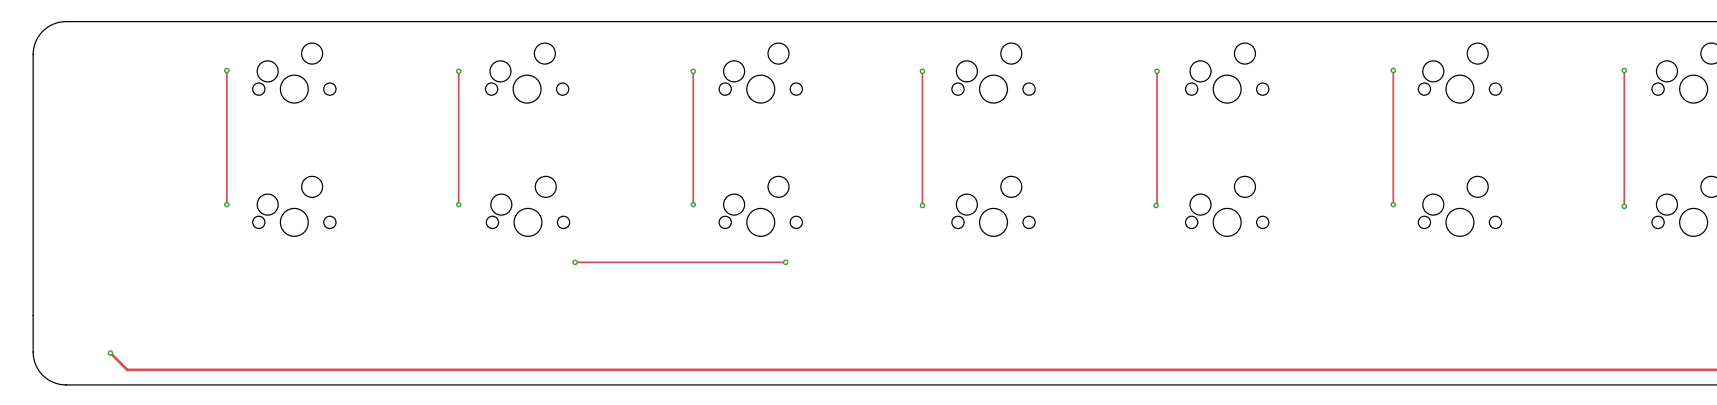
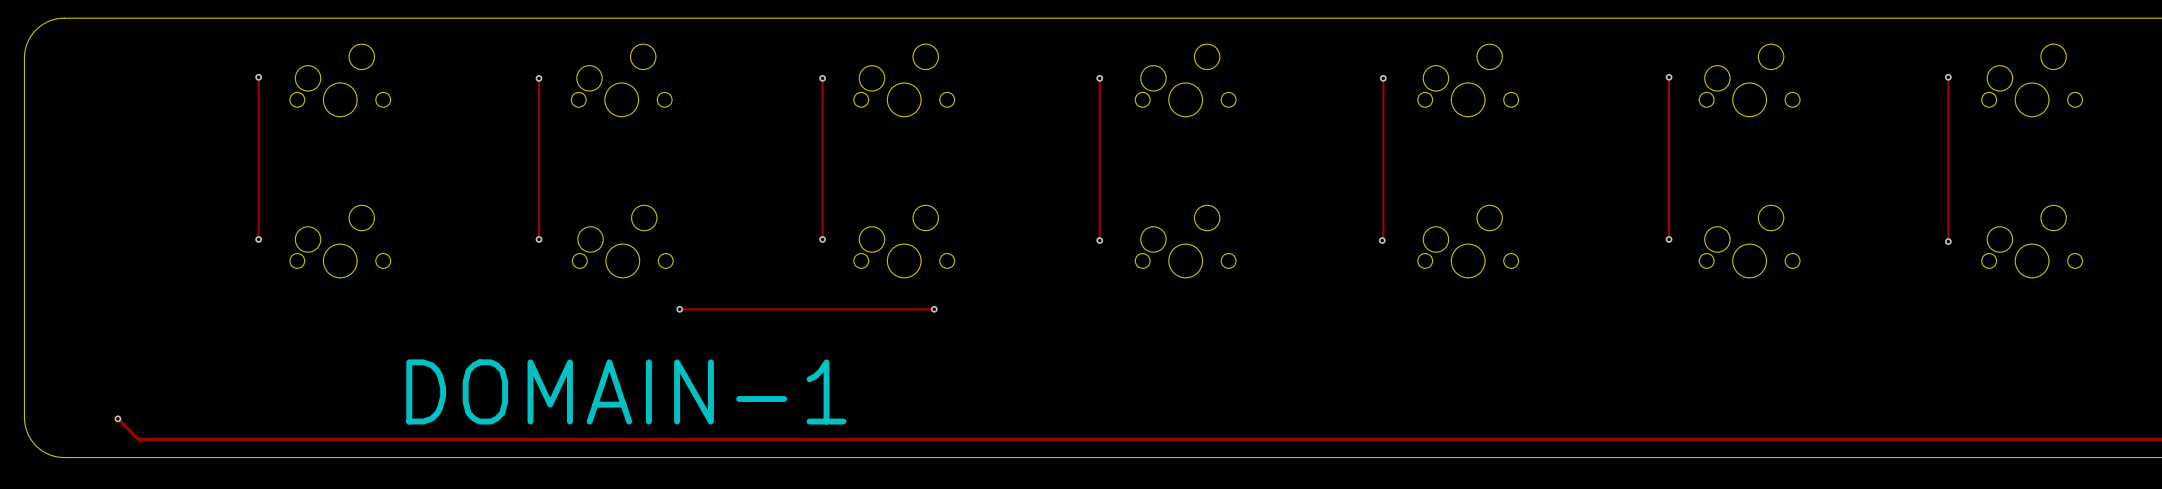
text: none -> DOMAIN-1 (626, 391)

